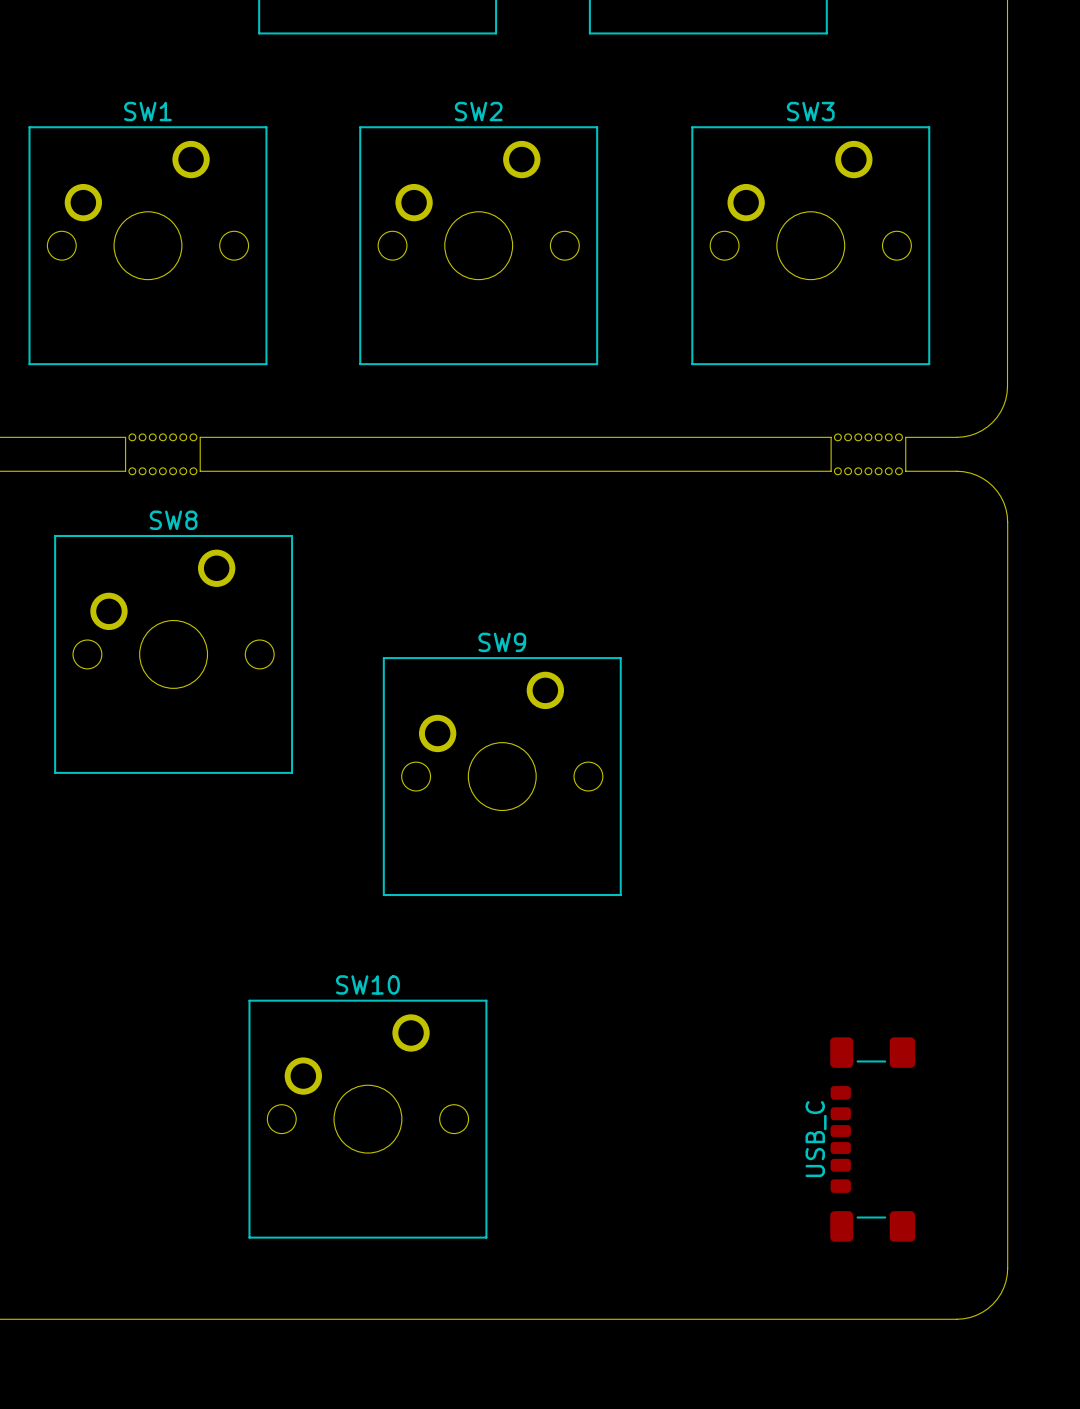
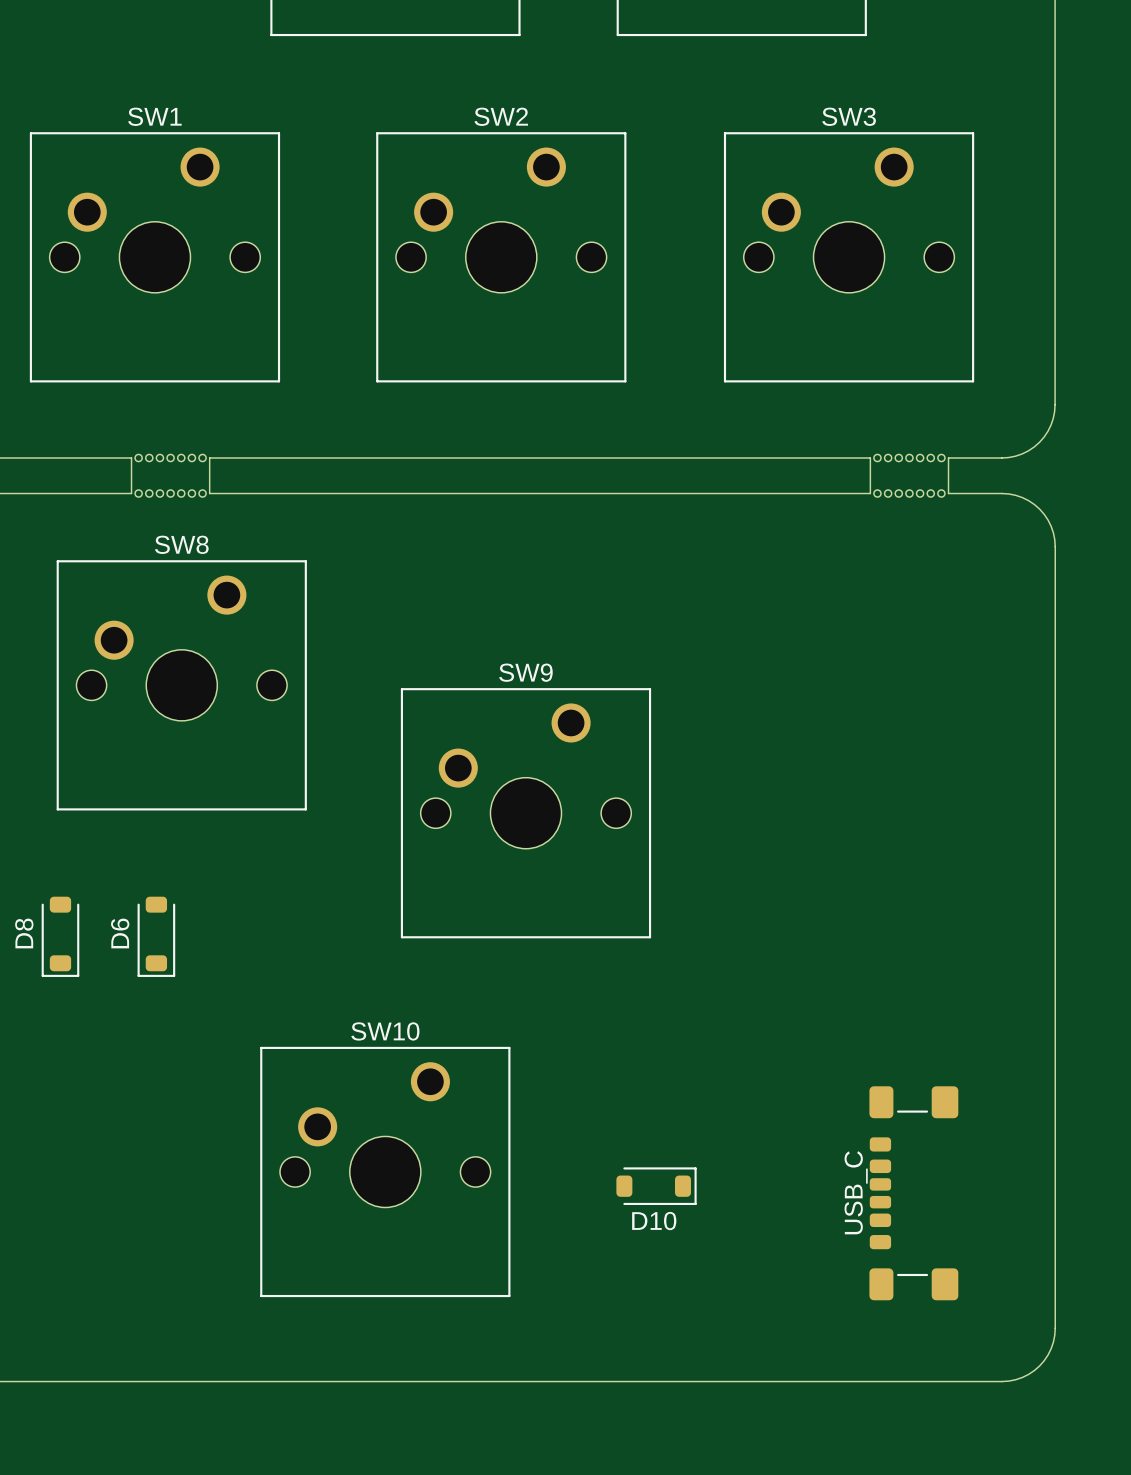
D8: none -> (60, 936)
D6: none -> (156, 936)
D10: none -> (656, 1186)

